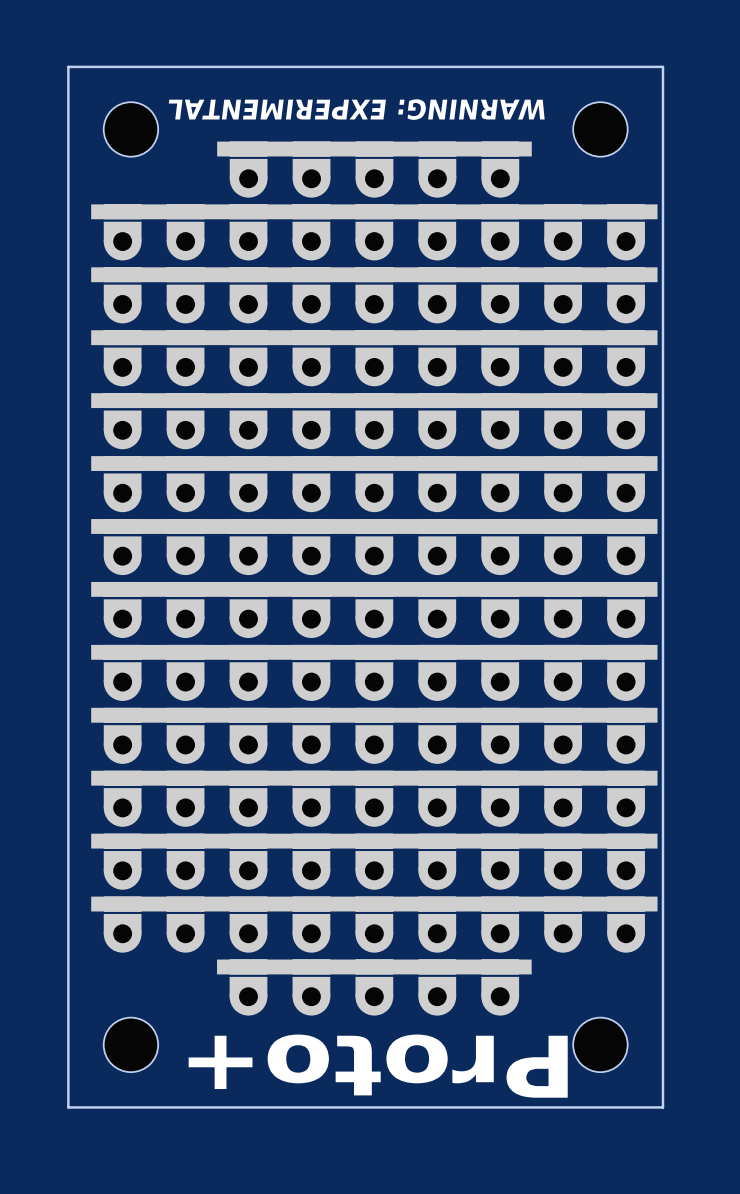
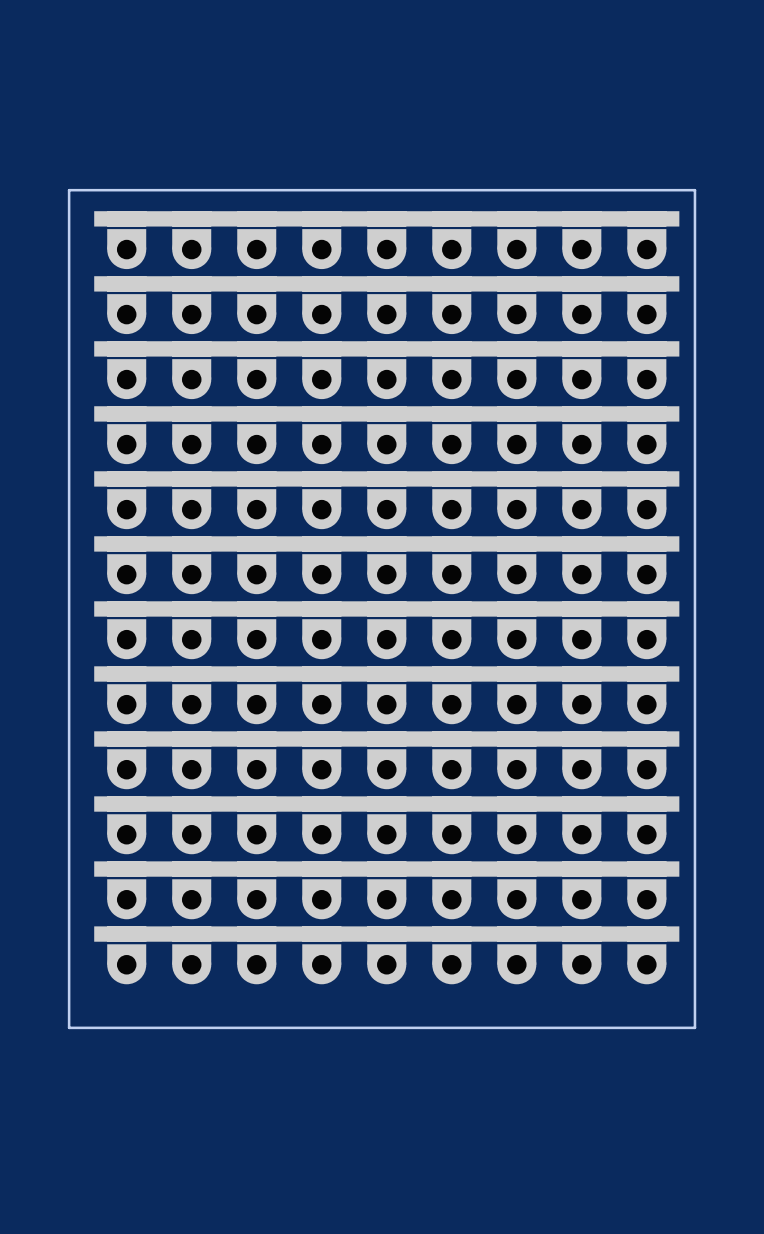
board edge: (662, 66) (68, 66) (68, 1107) (662, 1107) (662, 66) -> (694, 190) (694, 1027) (69, 1027) (69, 190) (694, 190)
text: WARNING: EXPERIMENTAL (356, 109) -> none
part: (130, 129) -> none
part: (600, 129) -> none
part: (248, 169) -> none
part: (311, 169) -> none
part: (374, 169) -> none
part: (437, 169) -> none
part: (500, 169) -> none
part: (248, 987) -> none
part: (311, 987) -> none
part: (374, 987) -> none
part: (437, 987) -> none
part: (500, 987) -> none
part: (130, 1044) -> none
part: (600, 1044) -> none
text: Proto+ (378, 1066) -> none

